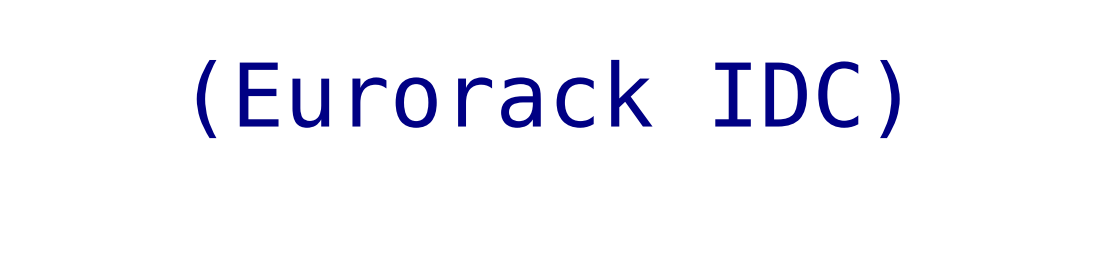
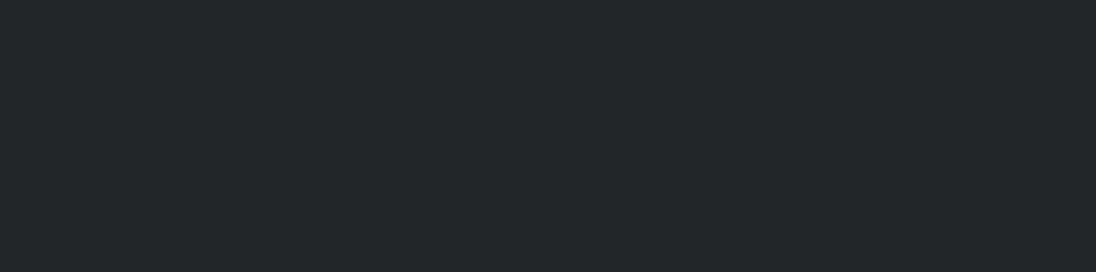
text: (Eurorack IDC) (548, 99) -> none

